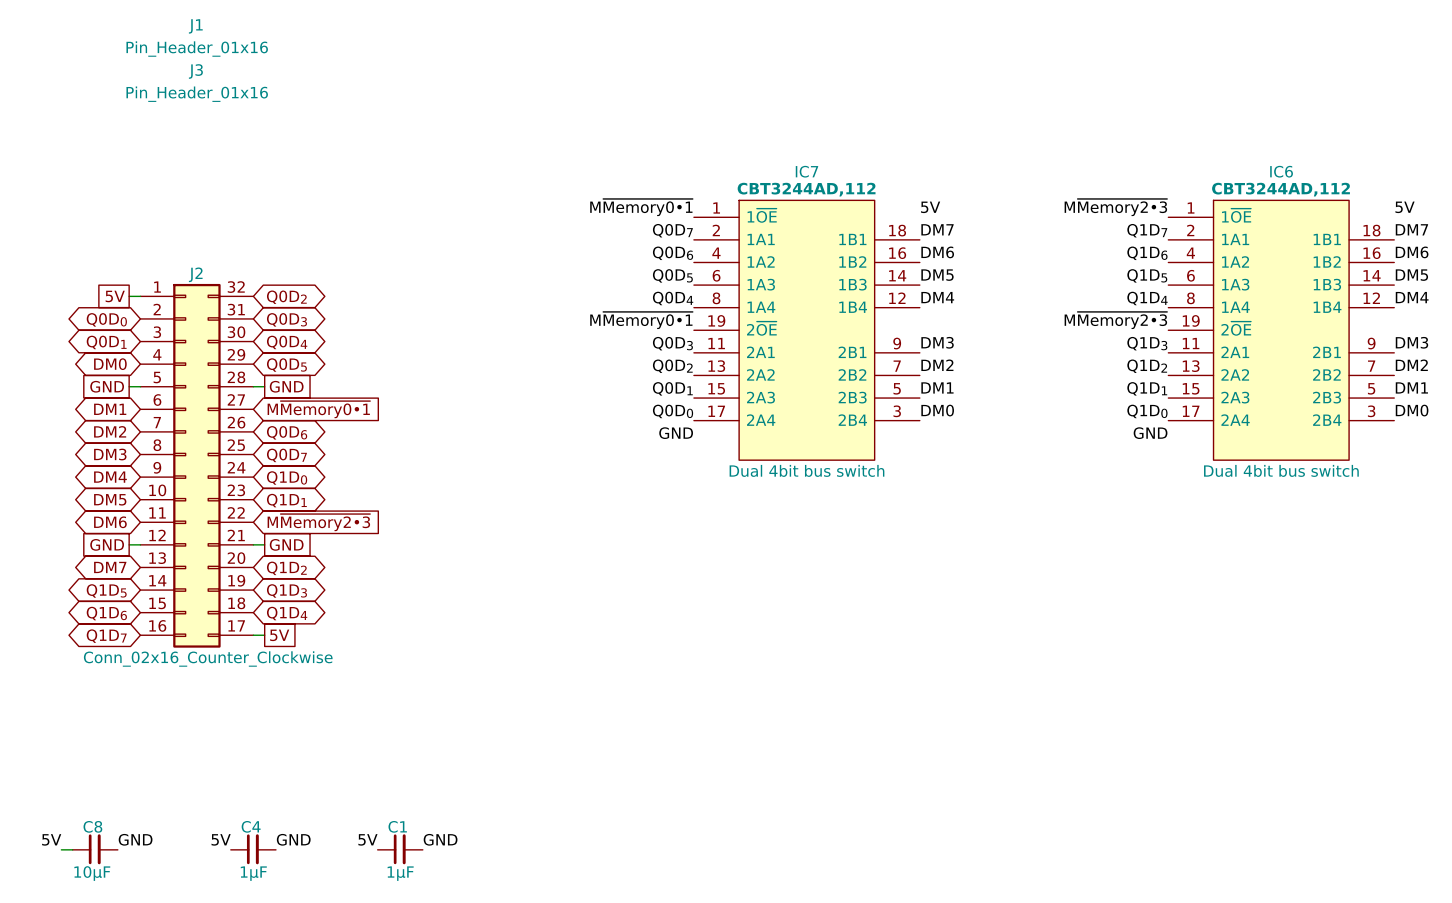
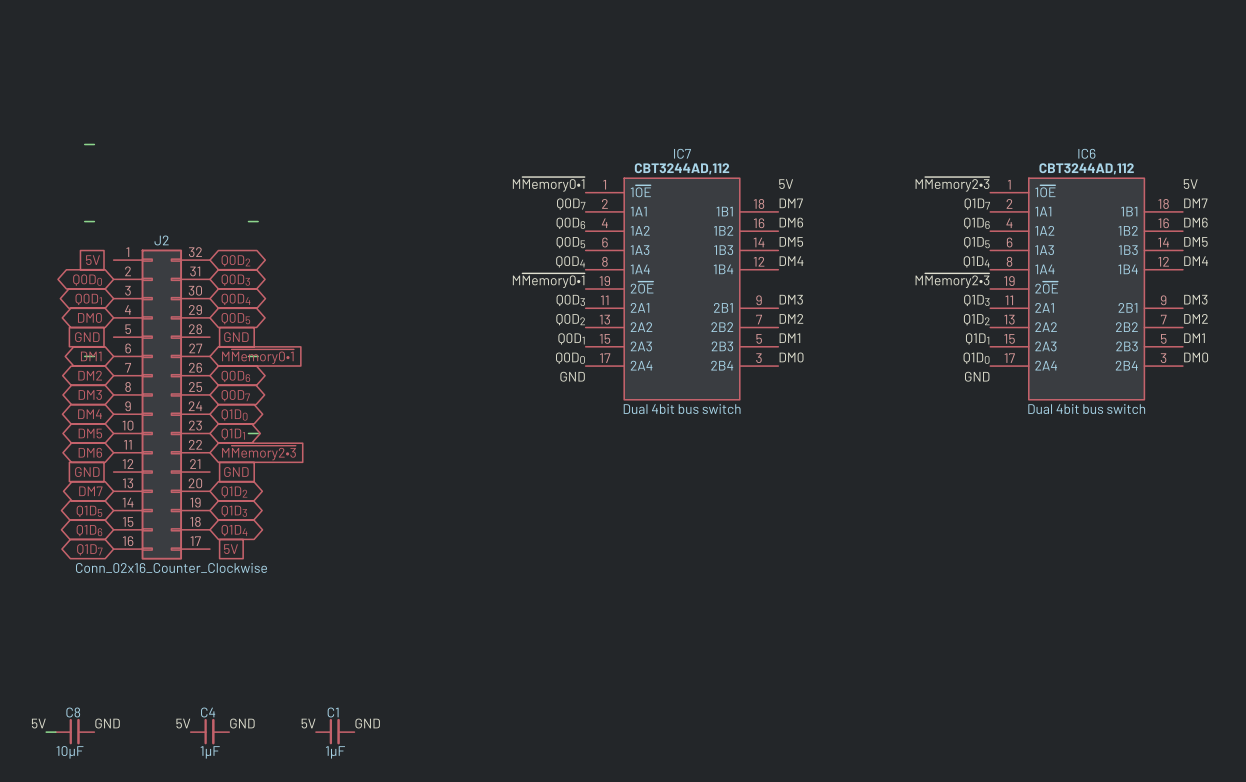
J1: Pin_Header_01x16 (197, 37) -> none
J3: Pin_Header_01x16 (197, 83) -> none
wire: (129, 296) (140, 296) -> (84, 144) (94, 144)
wire: (129, 386) (140, 386) -> (84, 221) (94, 221)
wire: (253, 386) (264, 386) -> (248, 221) (258, 221)
wire: (129, 544) (140, 544) -> (84, 356) (94, 356)
wire: (253, 544) (264, 544) -> (248, 356) (258, 356)
wire: (253, 635) (264, 635) -> (248, 433) (258, 433)

